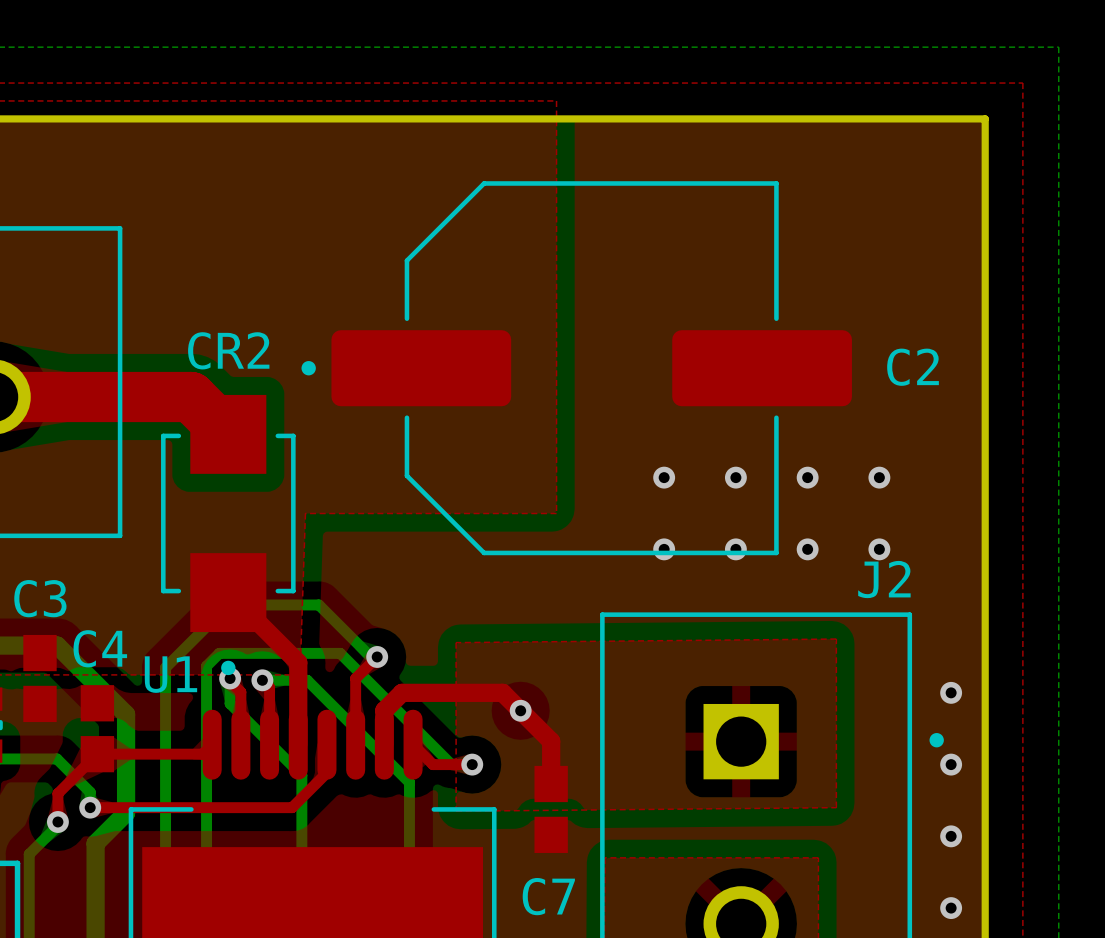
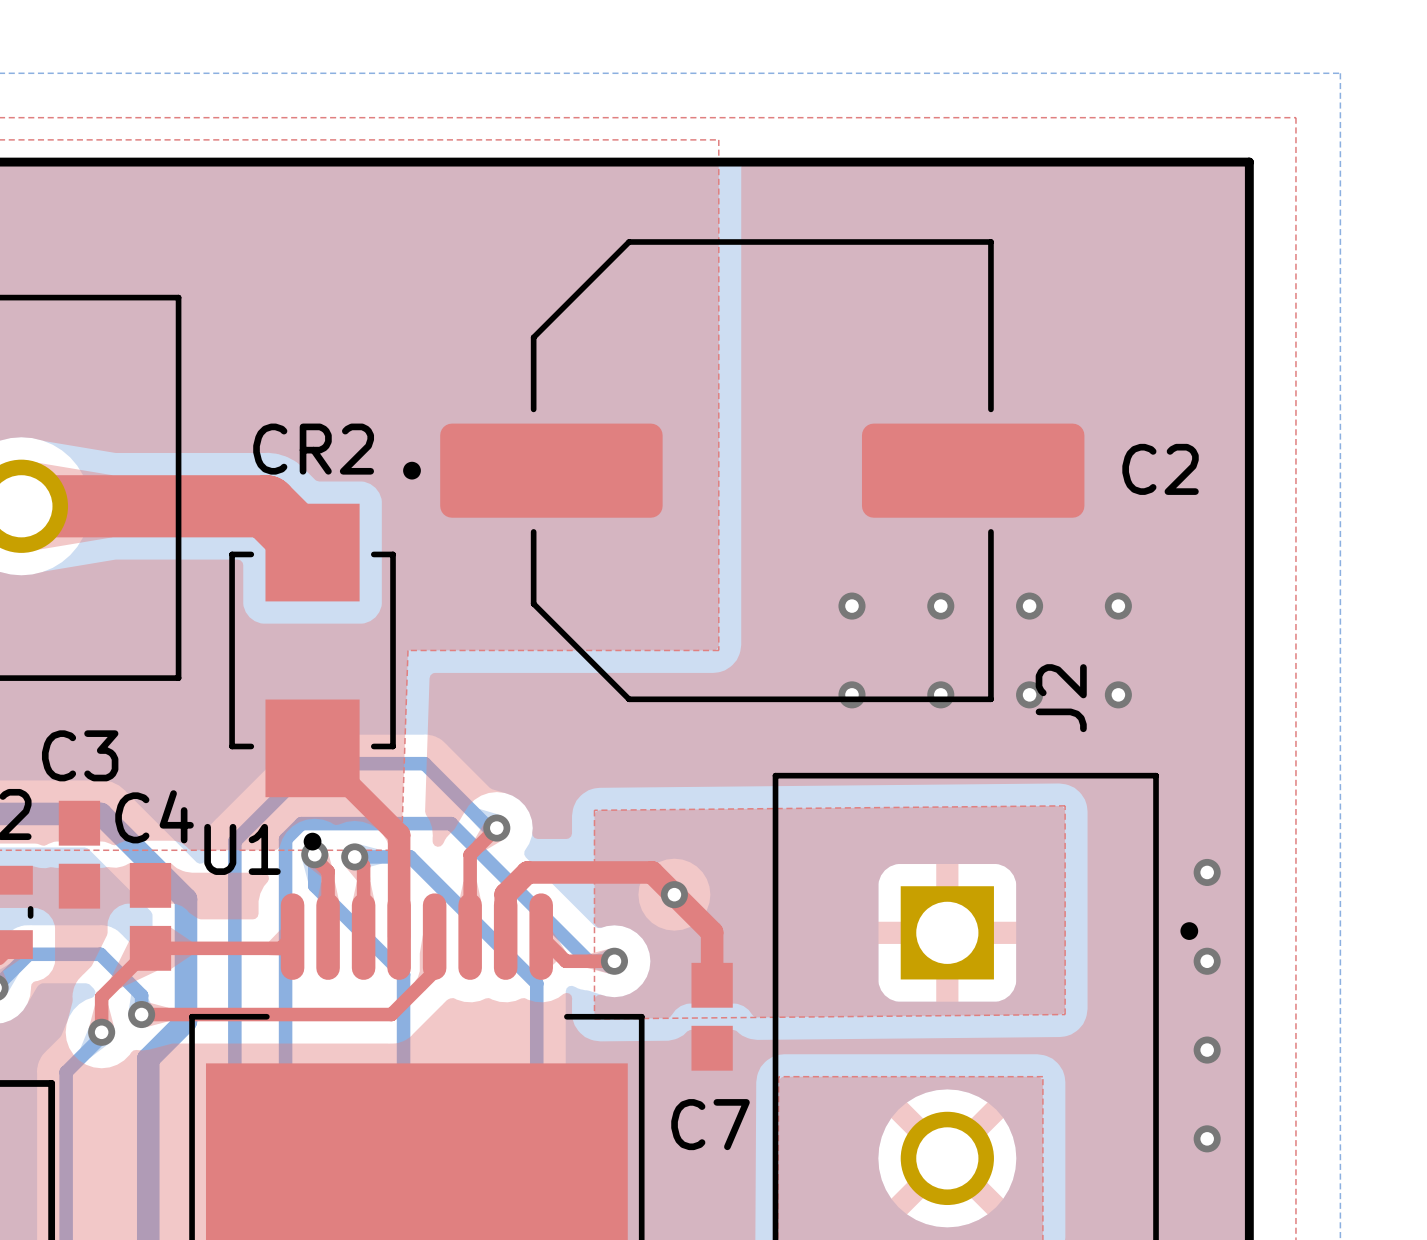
J2 name rotation: 0° (884, 579) -> 90° counterclockwise (1061, 698)

